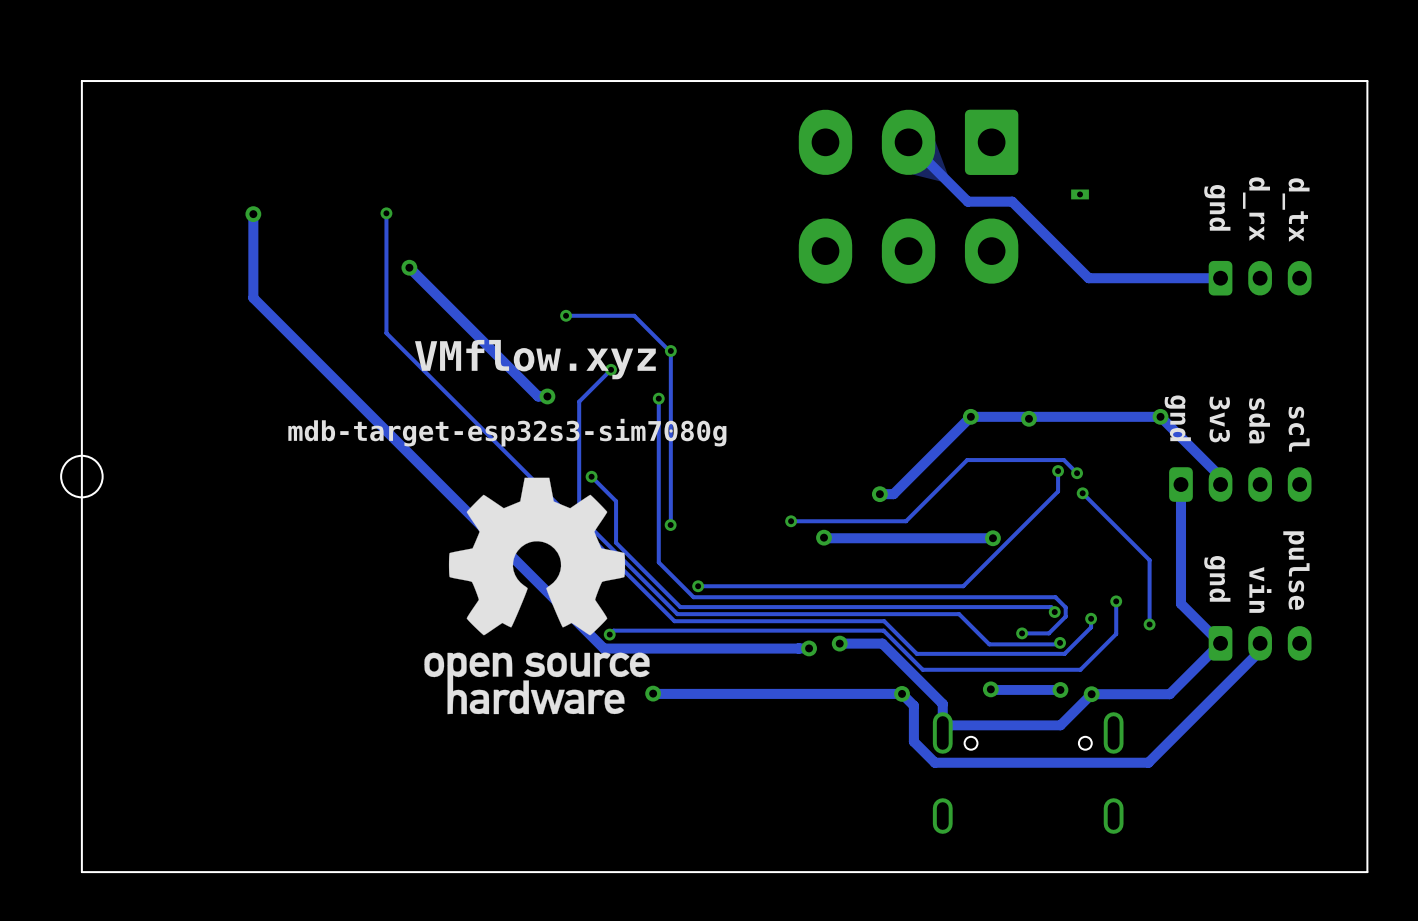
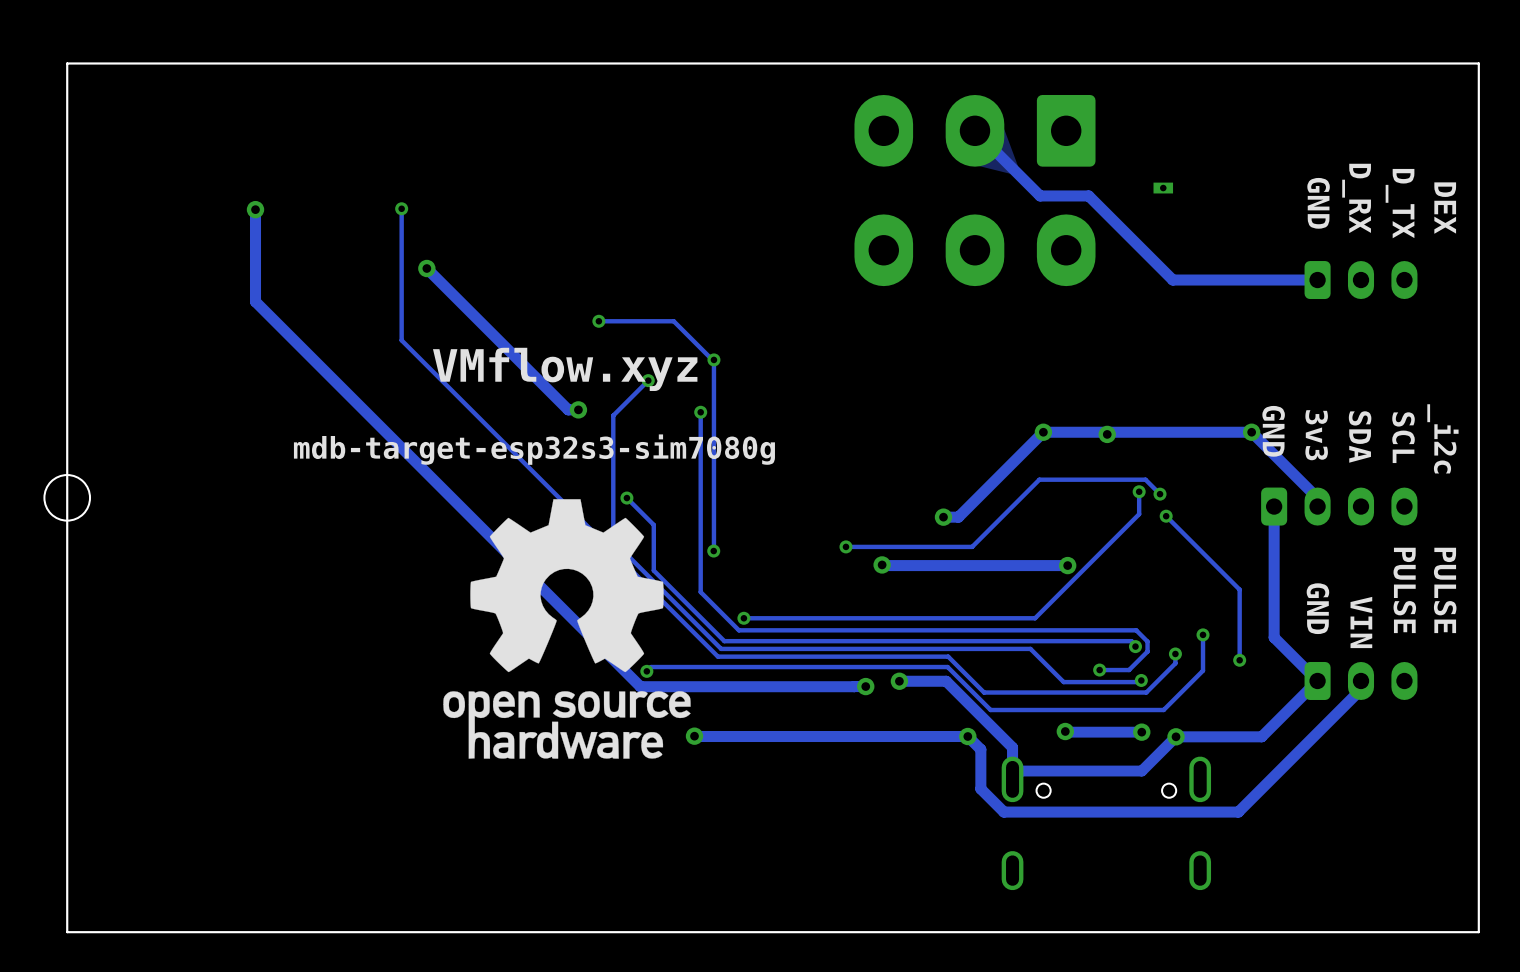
text: gnd (1217, 207) -> GND (1318, 203)
text: d_rx (1256, 209) -> D_RX (1356, 198)
text: d_tx (1296, 210) -> D_TX (1400, 203)
text: none -> DEX (1445, 208)
text: gnd (1177, 418) -> GND (1273, 431)
text: sda (1259, 420) -> SDA (1360, 437)
text: none -> _i2c (1442, 438)
text: scl (1299, 429) -> SCL (1403, 437)
text: none -> PULSE (1445, 590)
text: pulse (1296, 570) -> PULSE (1404, 590)
text: gnd (1217, 578) -> GND (1317, 608)
text: vin (1260, 589) -> VIN (1361, 622)

